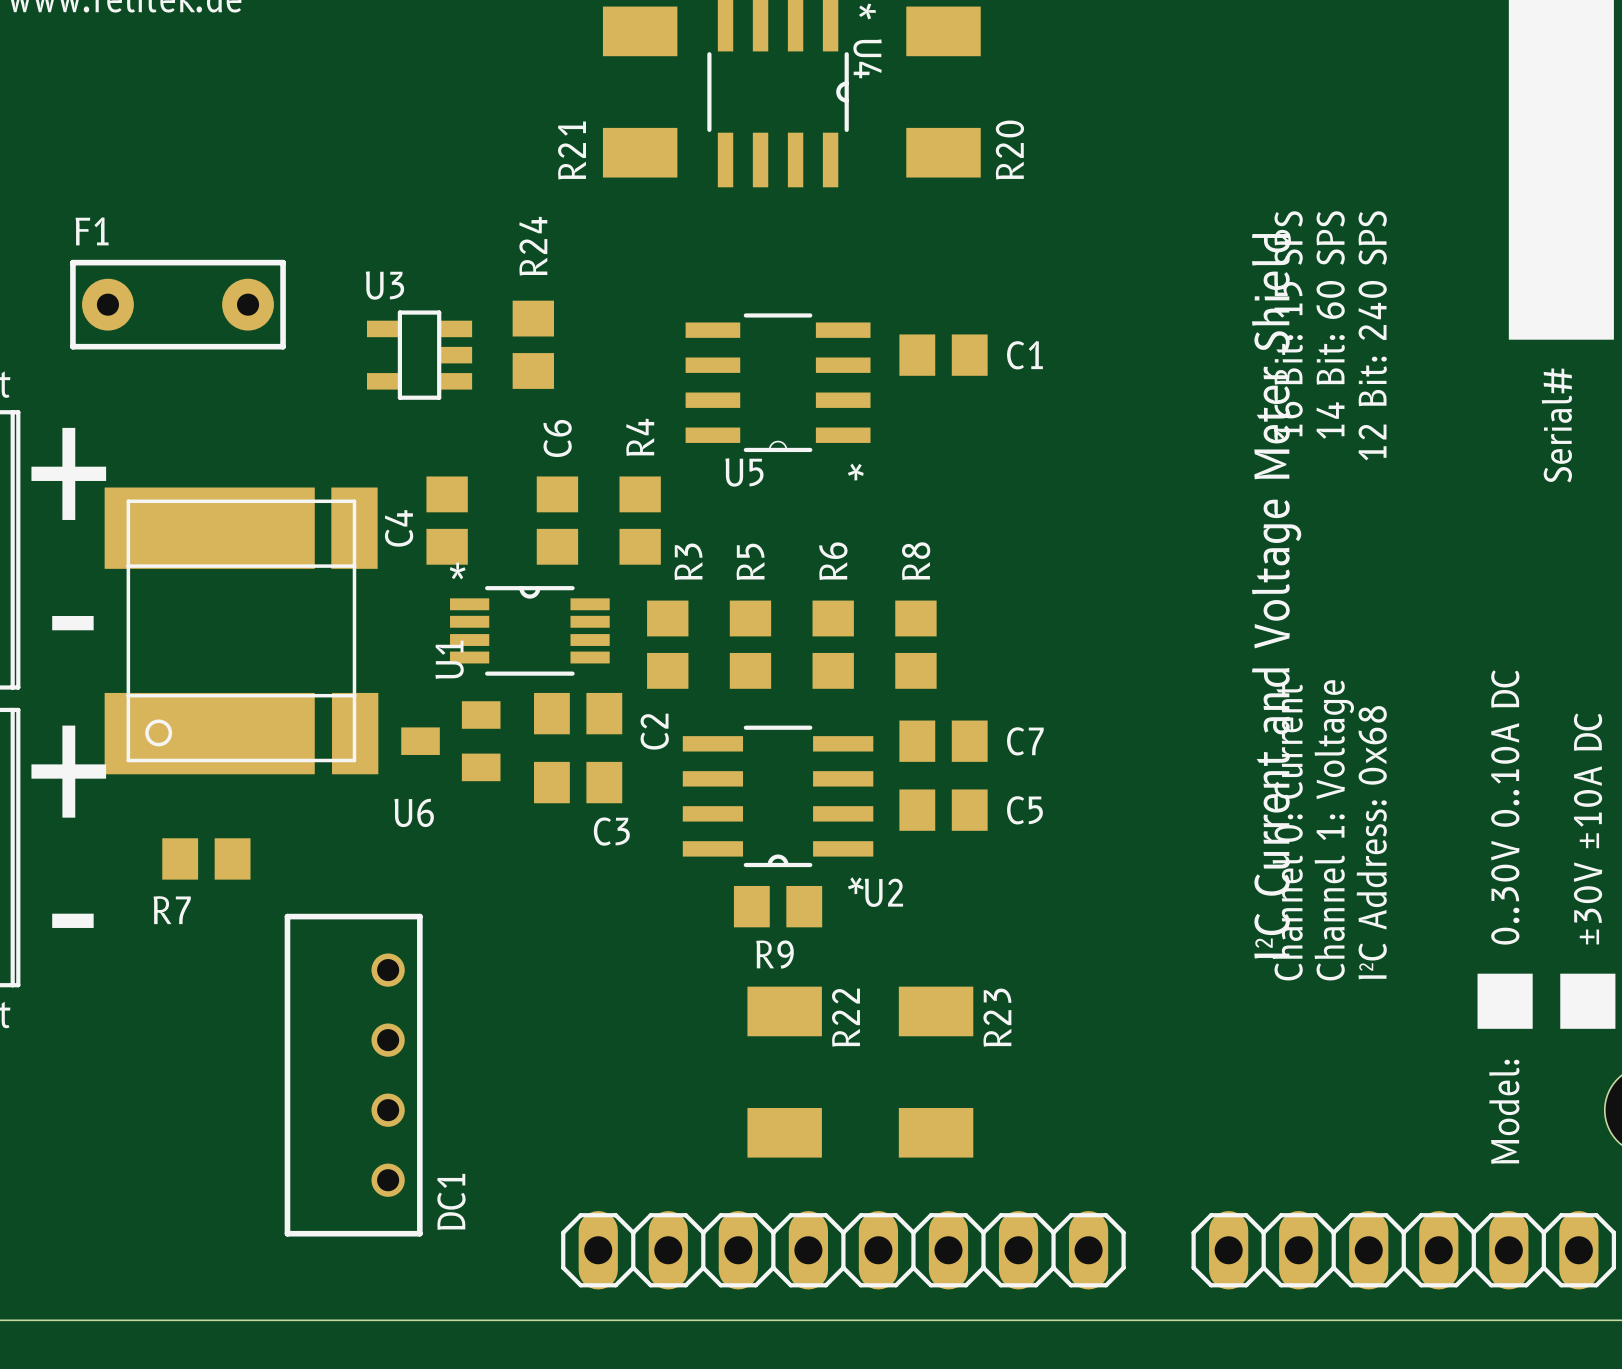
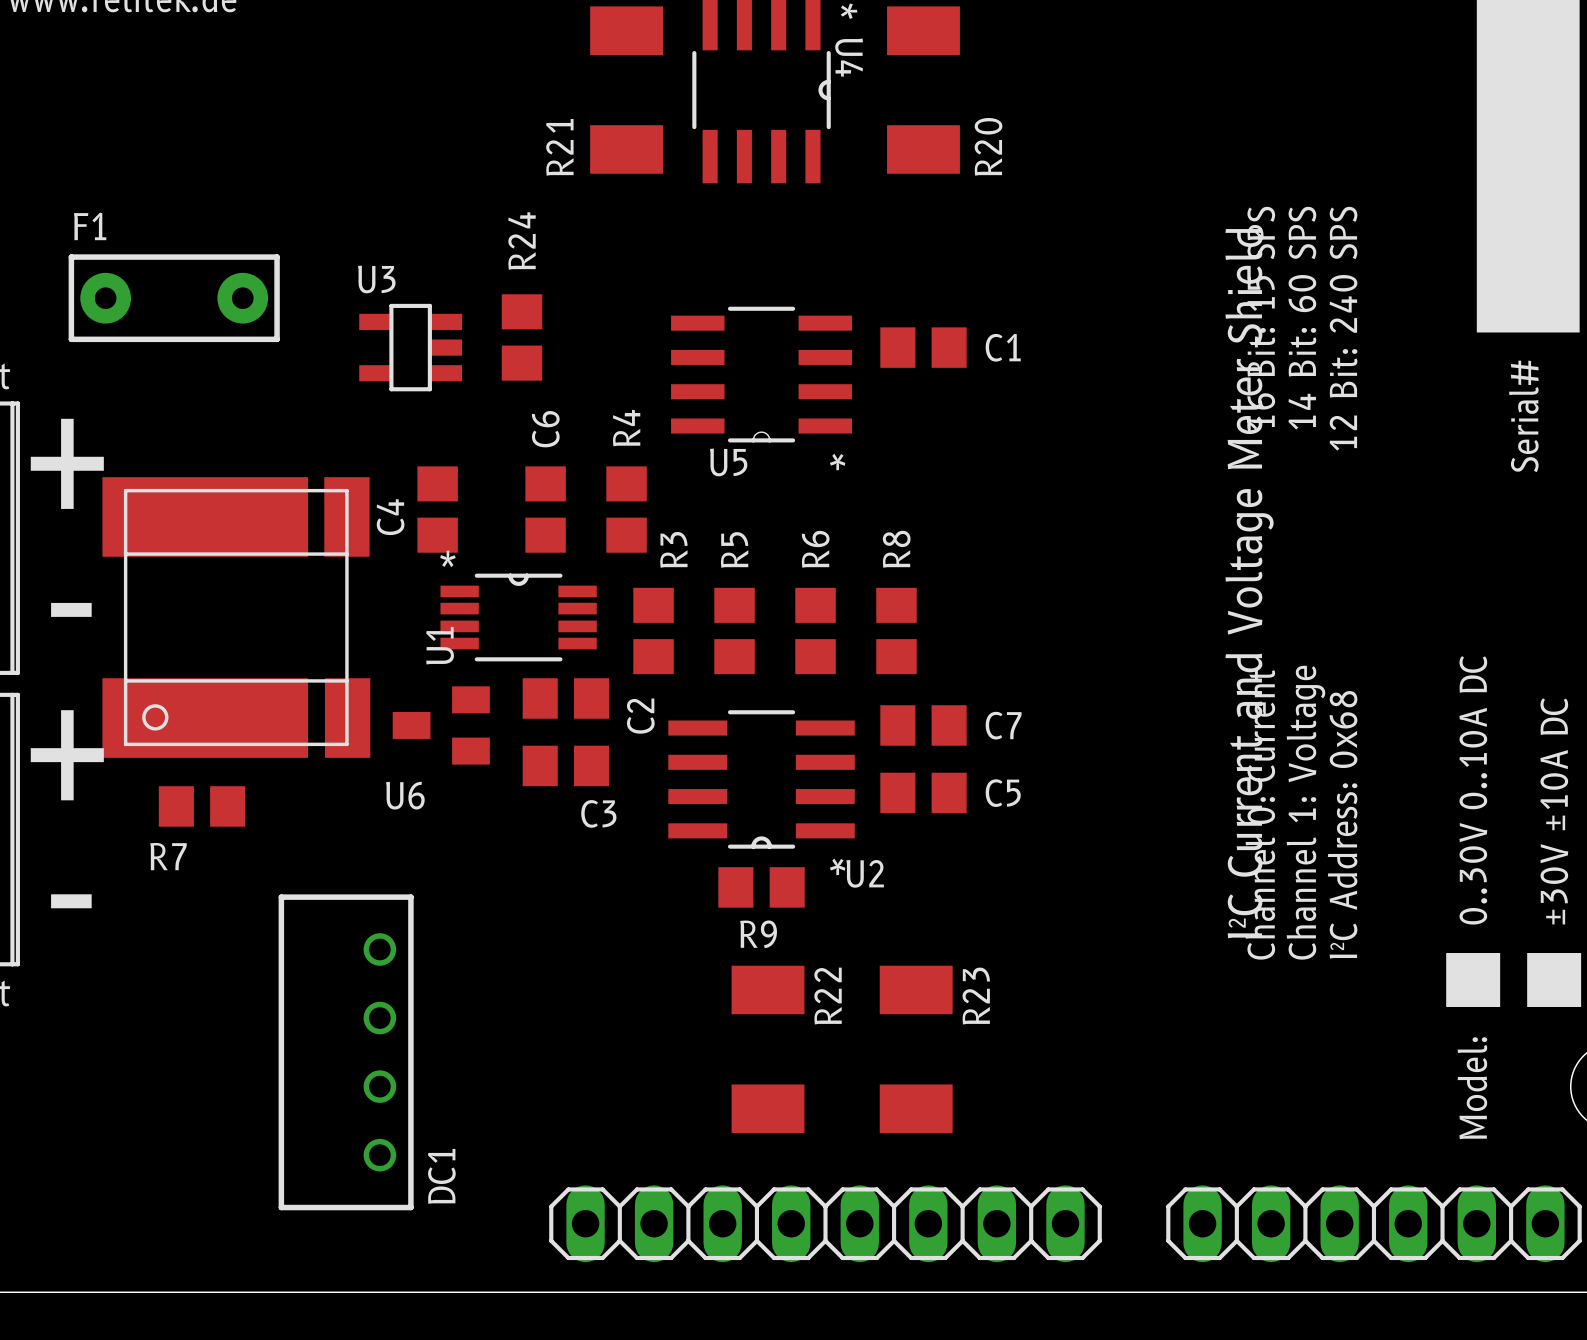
R7 position: (206, 858) -> (202, 806)

